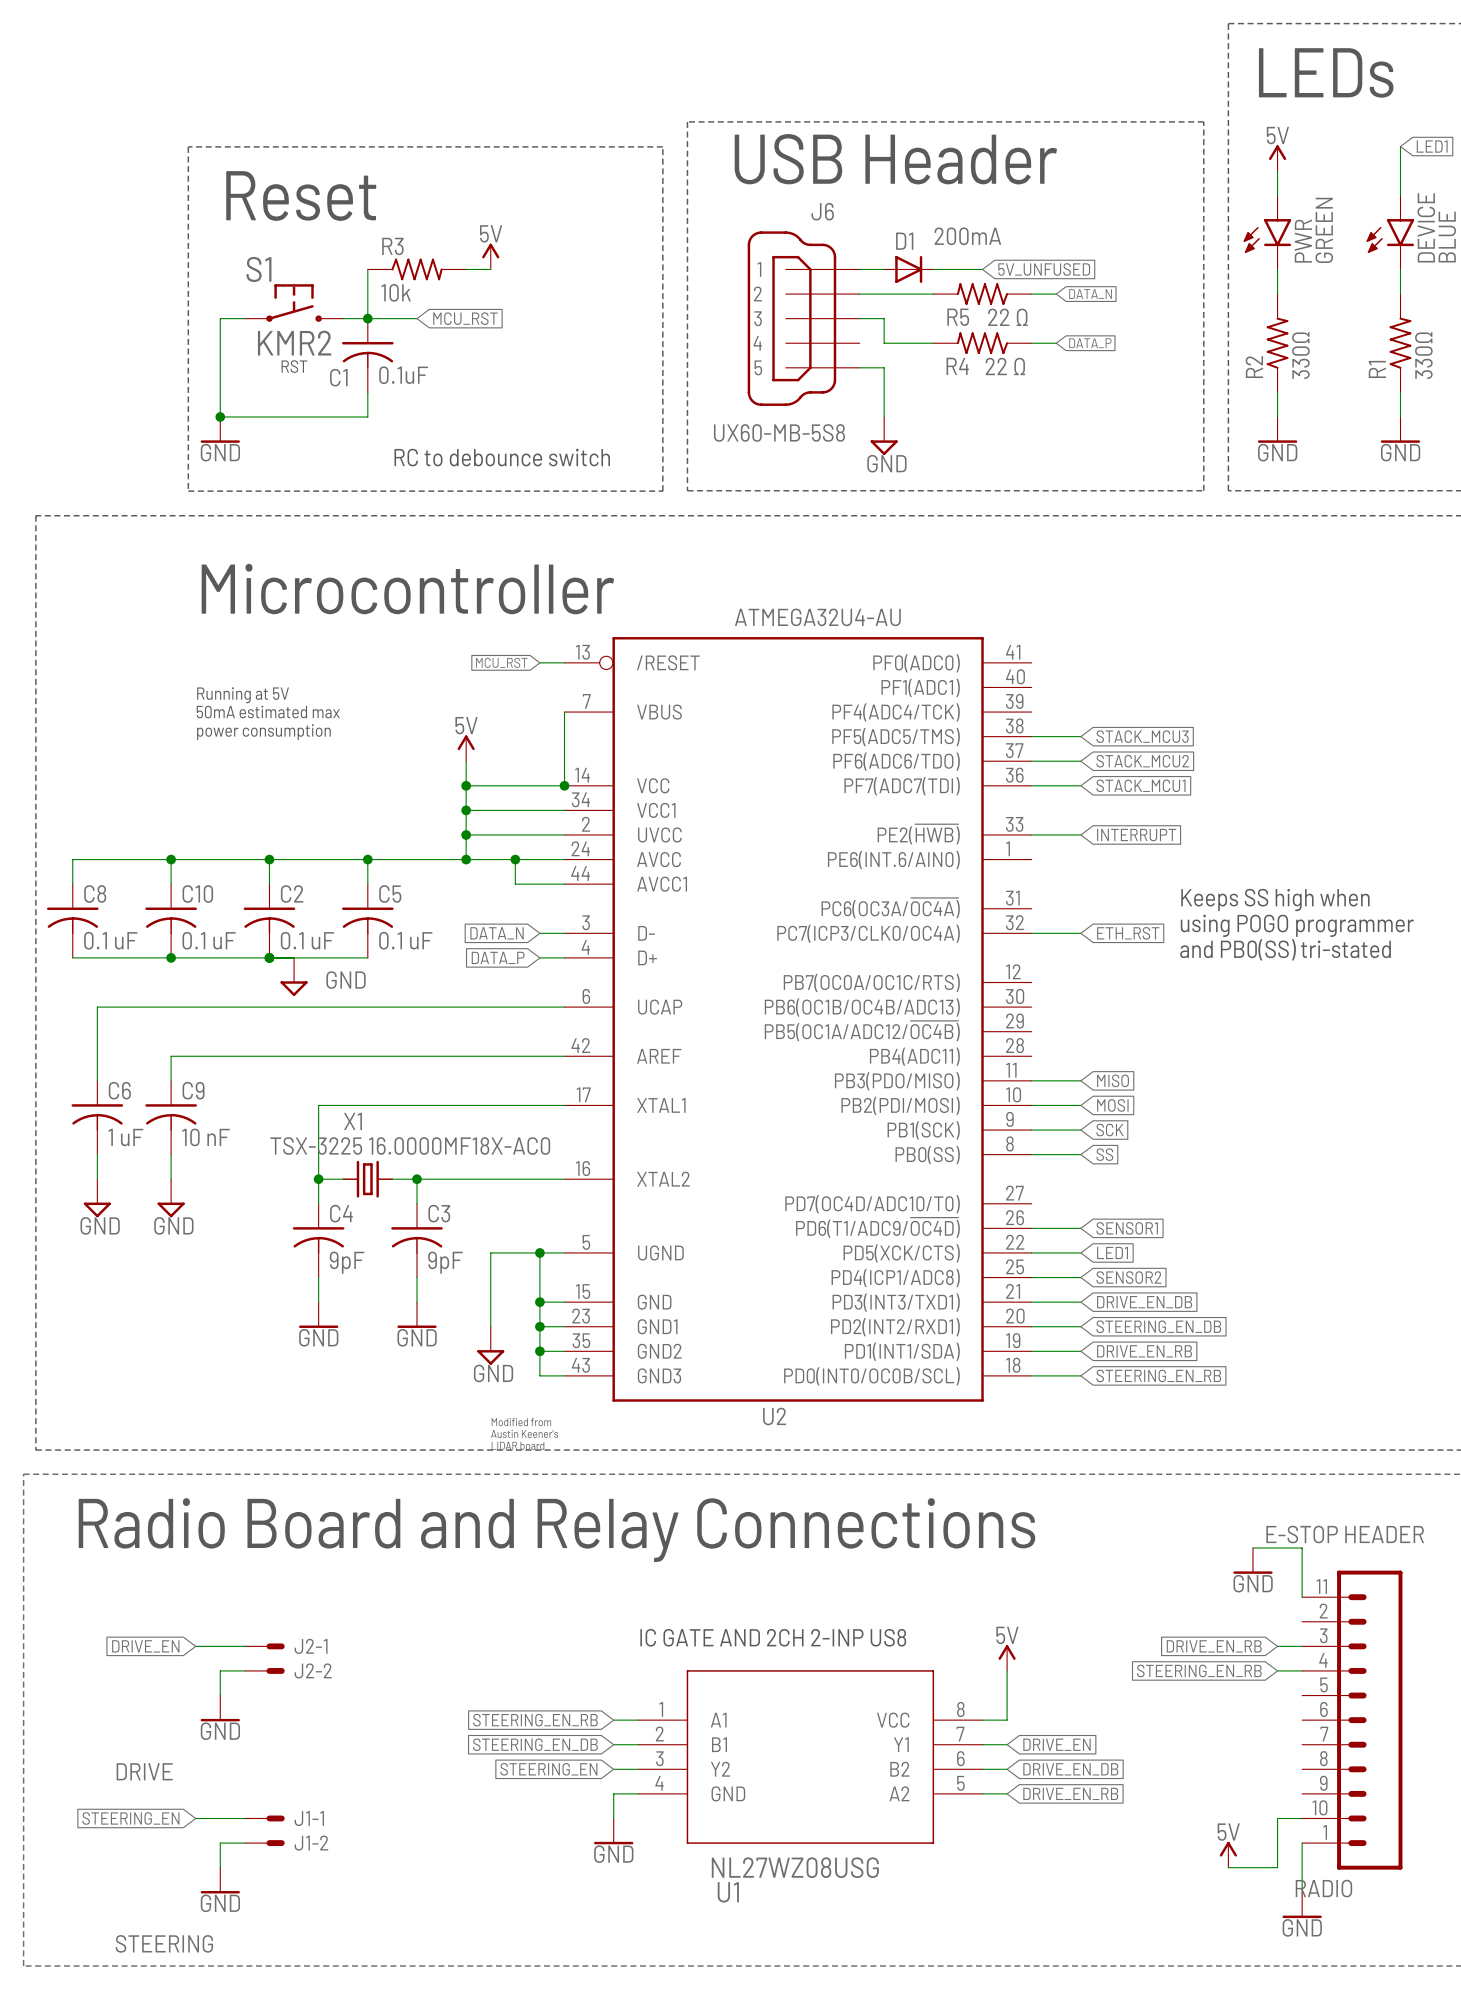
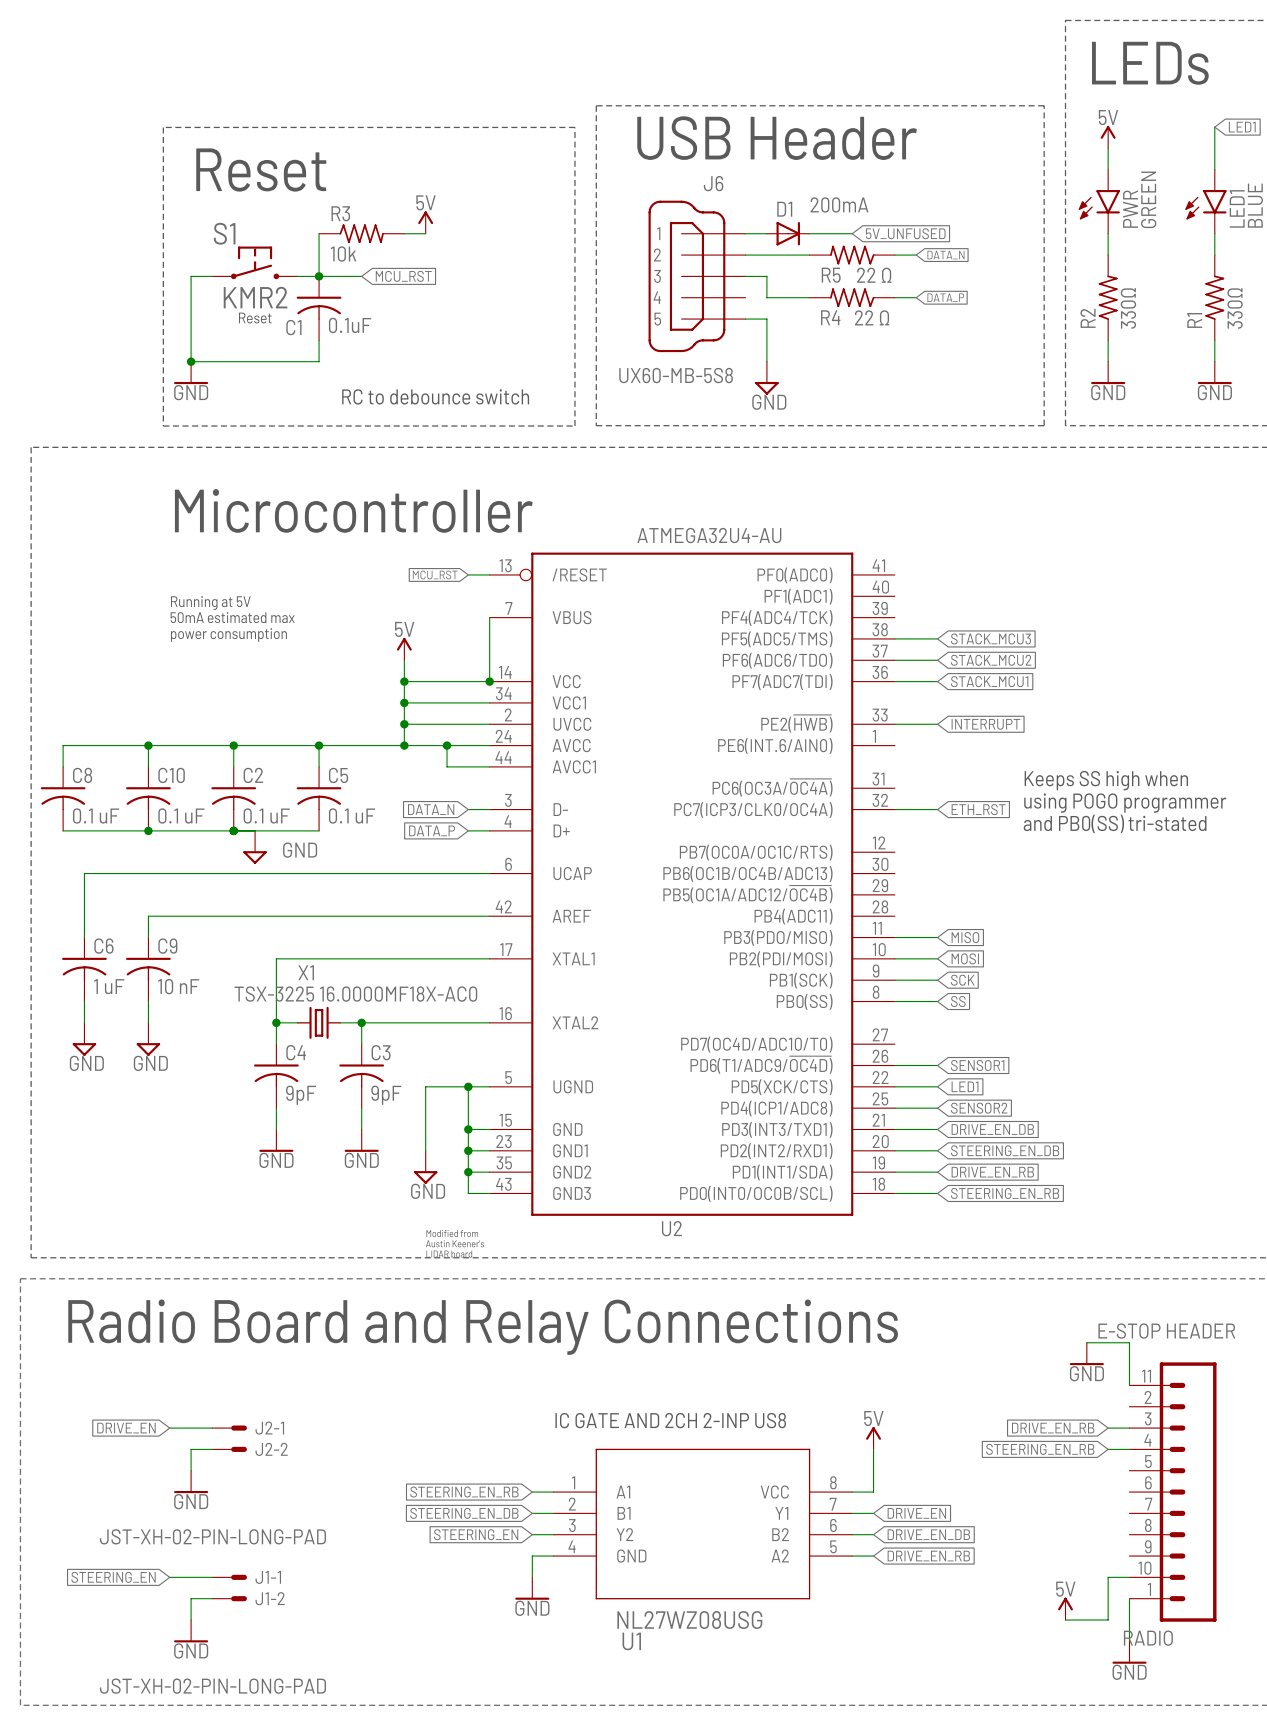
DEVICE name: DEVICE (1426, 227) -> LED1 (1237, 208)
S1 text: RST (294, 366) -> Reset (255, 318)
J2-1 value: DRIVE (144, 1771) -> JST-XH-02-PIN-LONG-PAD (212, 1536)
J1-1 value: STEERING (164, 1943) -> JST-XH-02-PIN-LONG-PAD (212, 1686)

